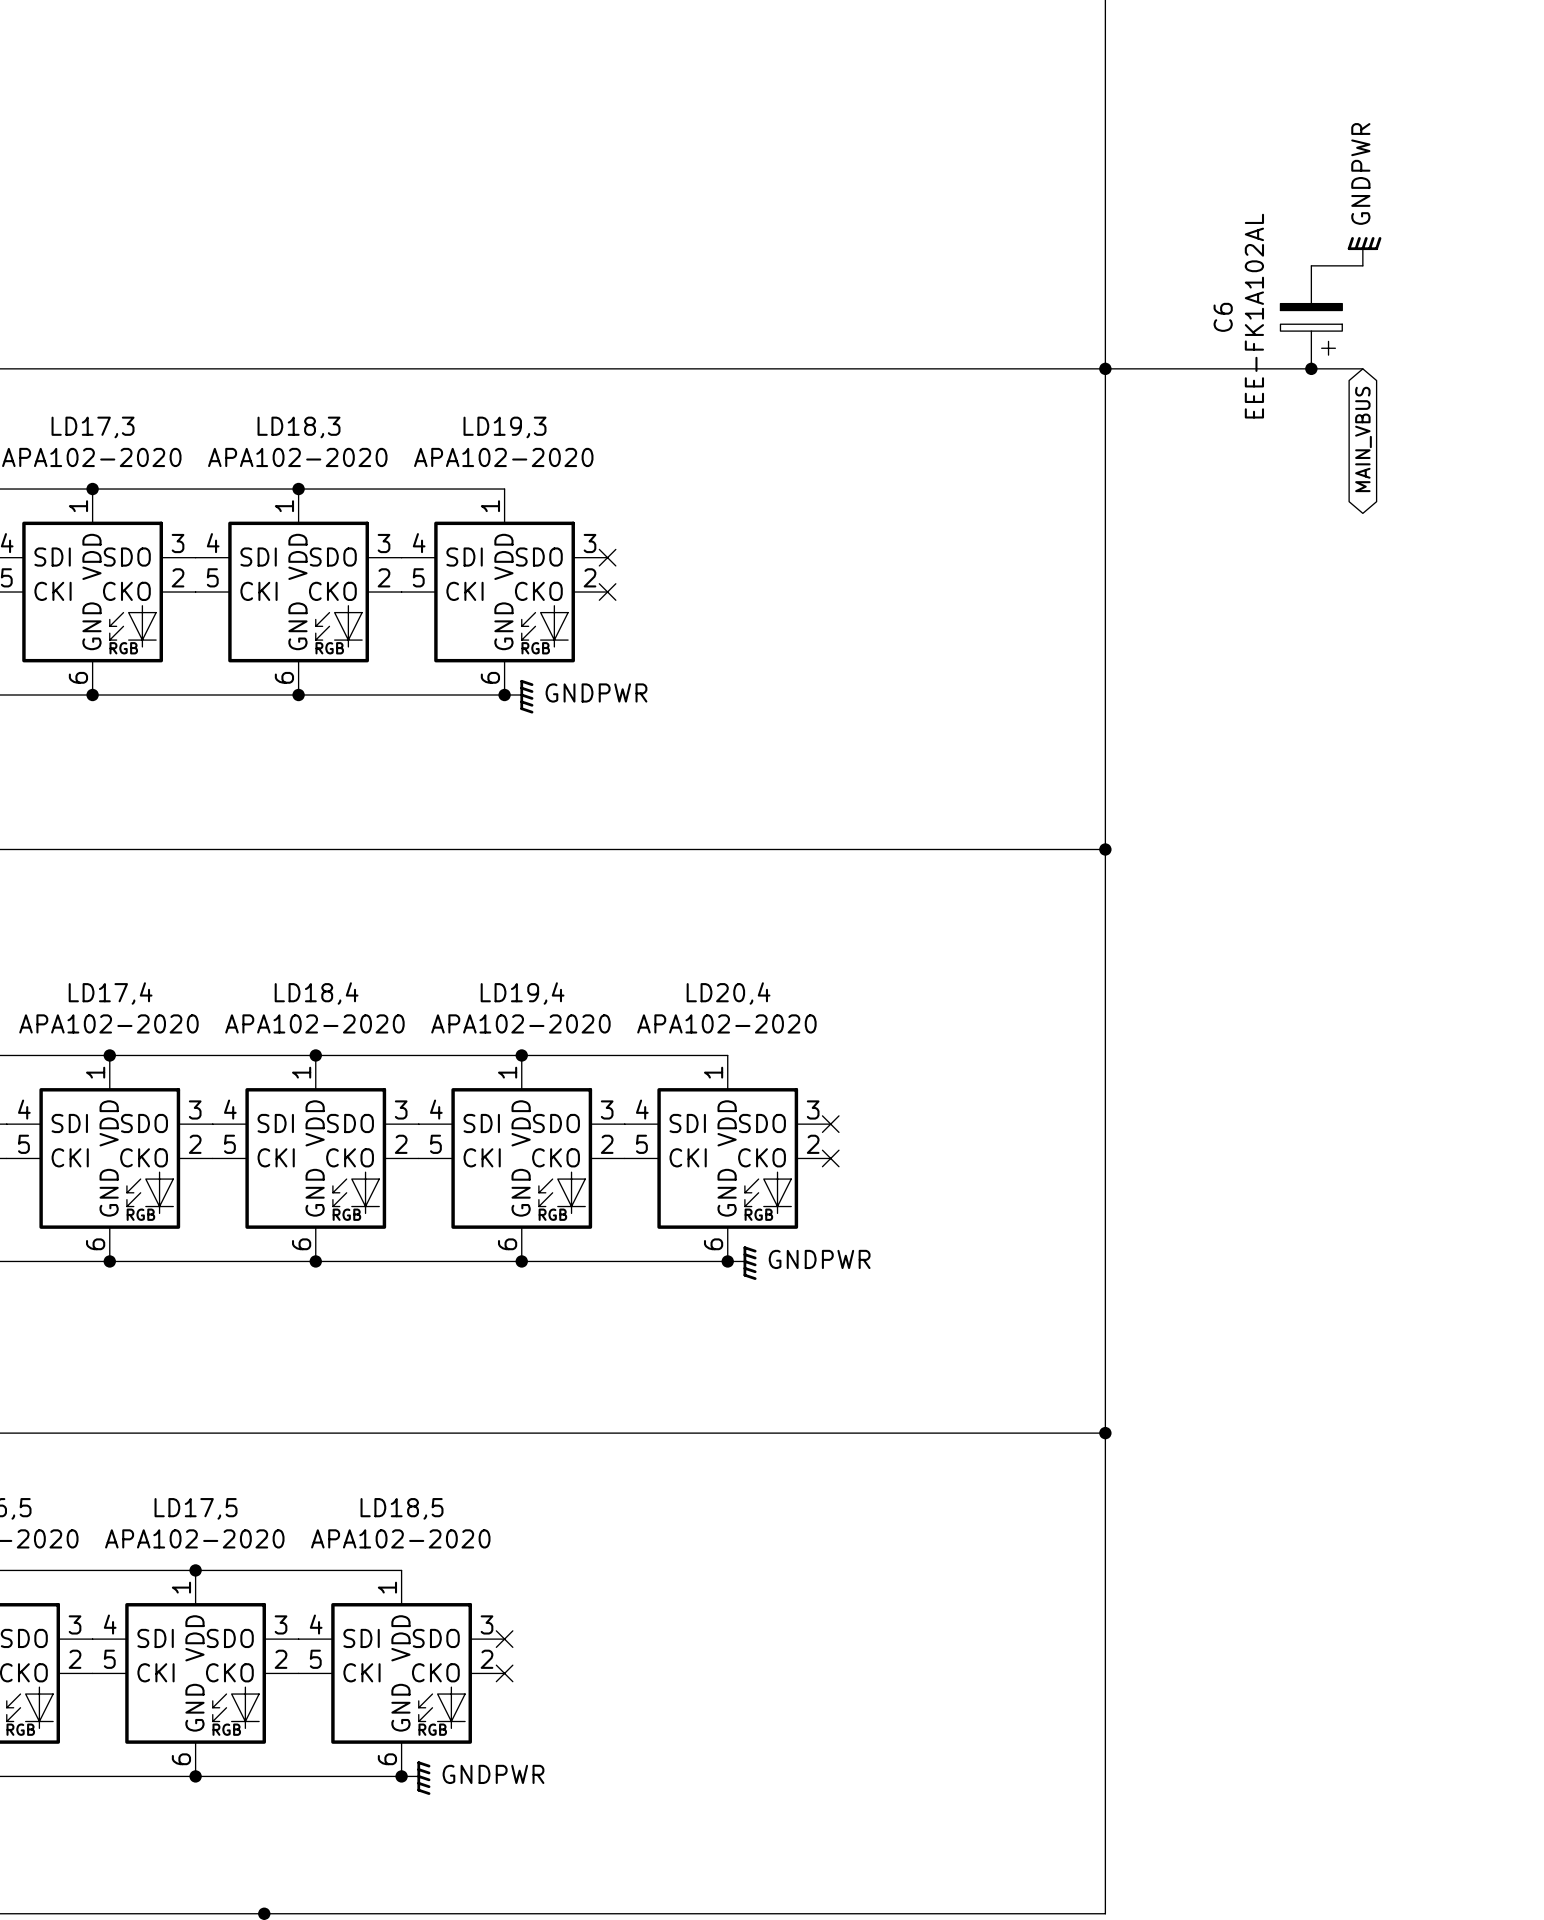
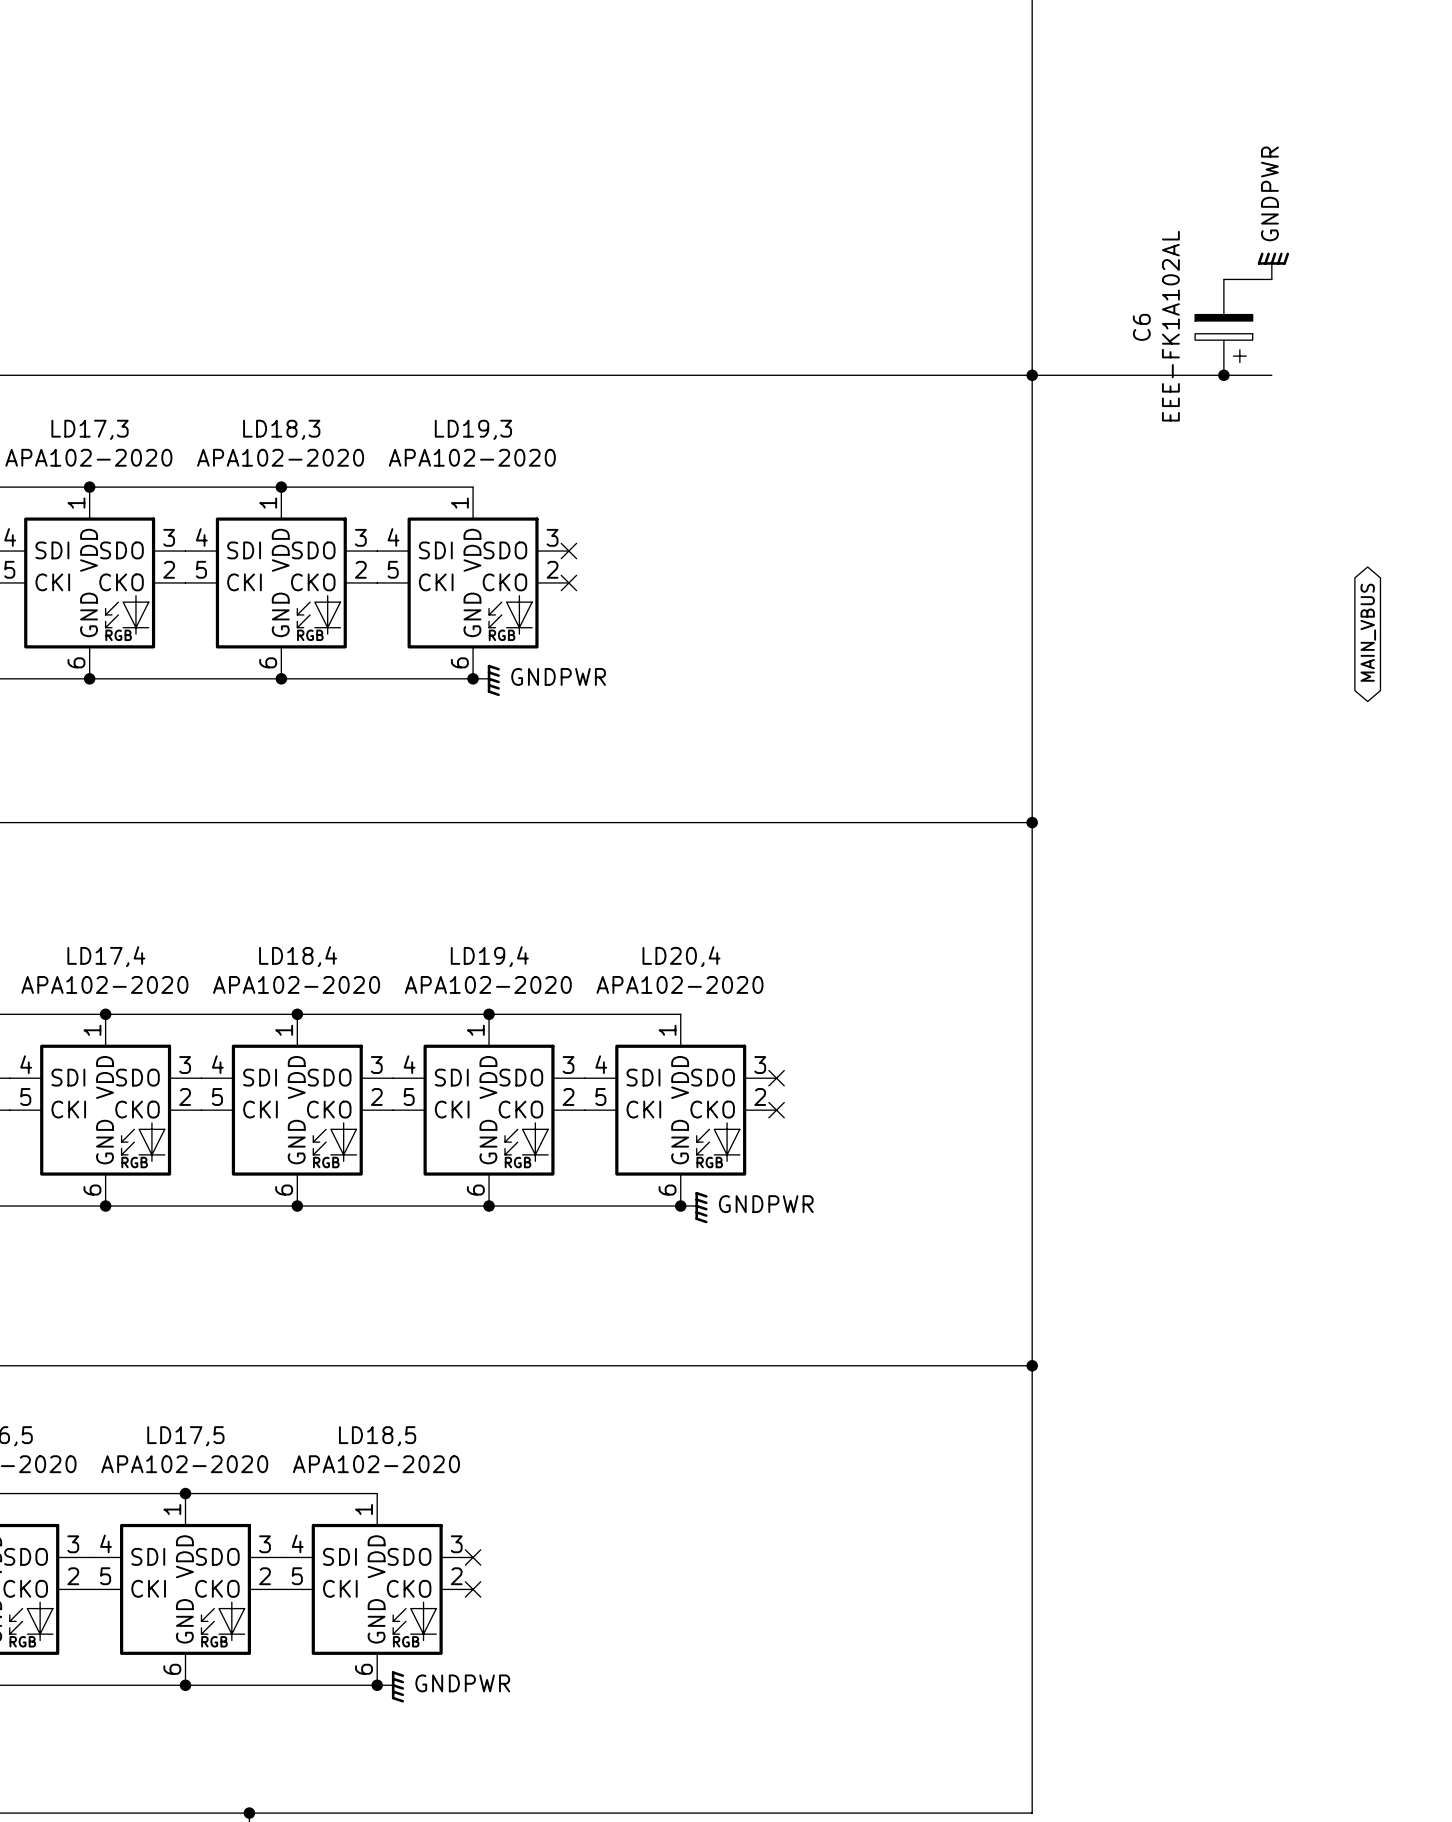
global label position: MAIN_VBUS (1363, 439) -> MAIN_VBUS (1368, 632)

